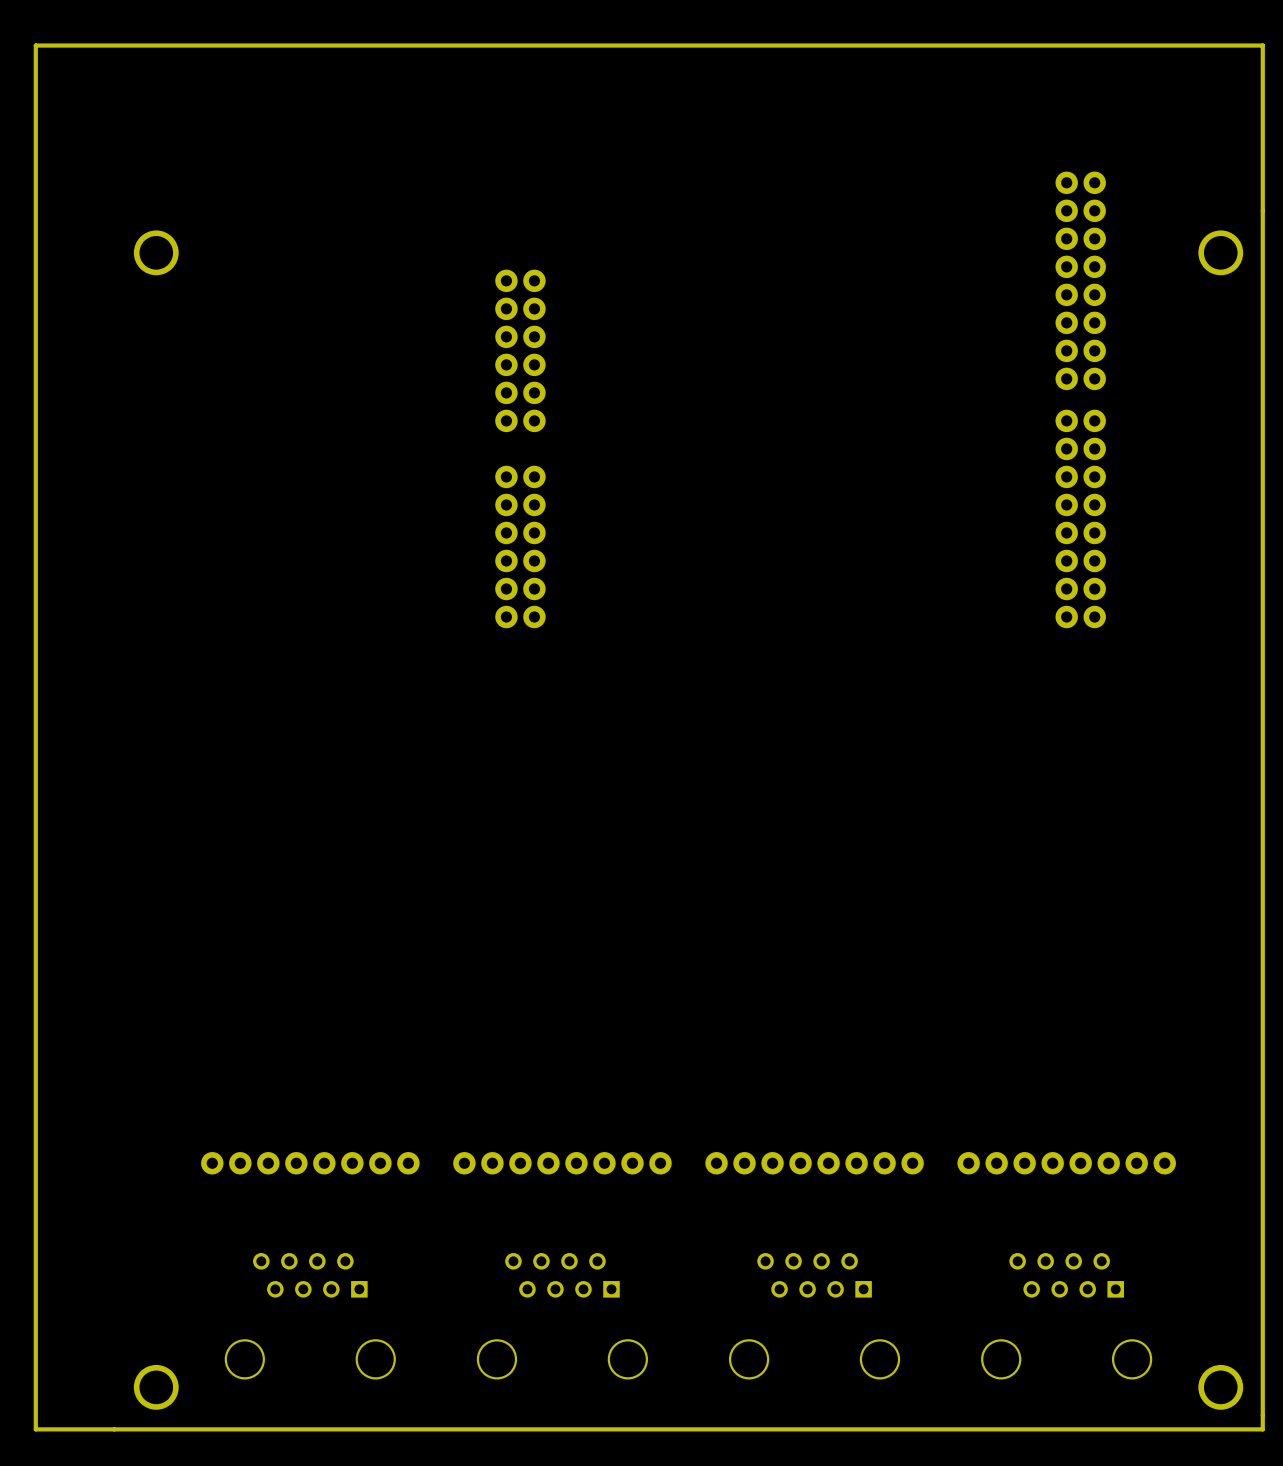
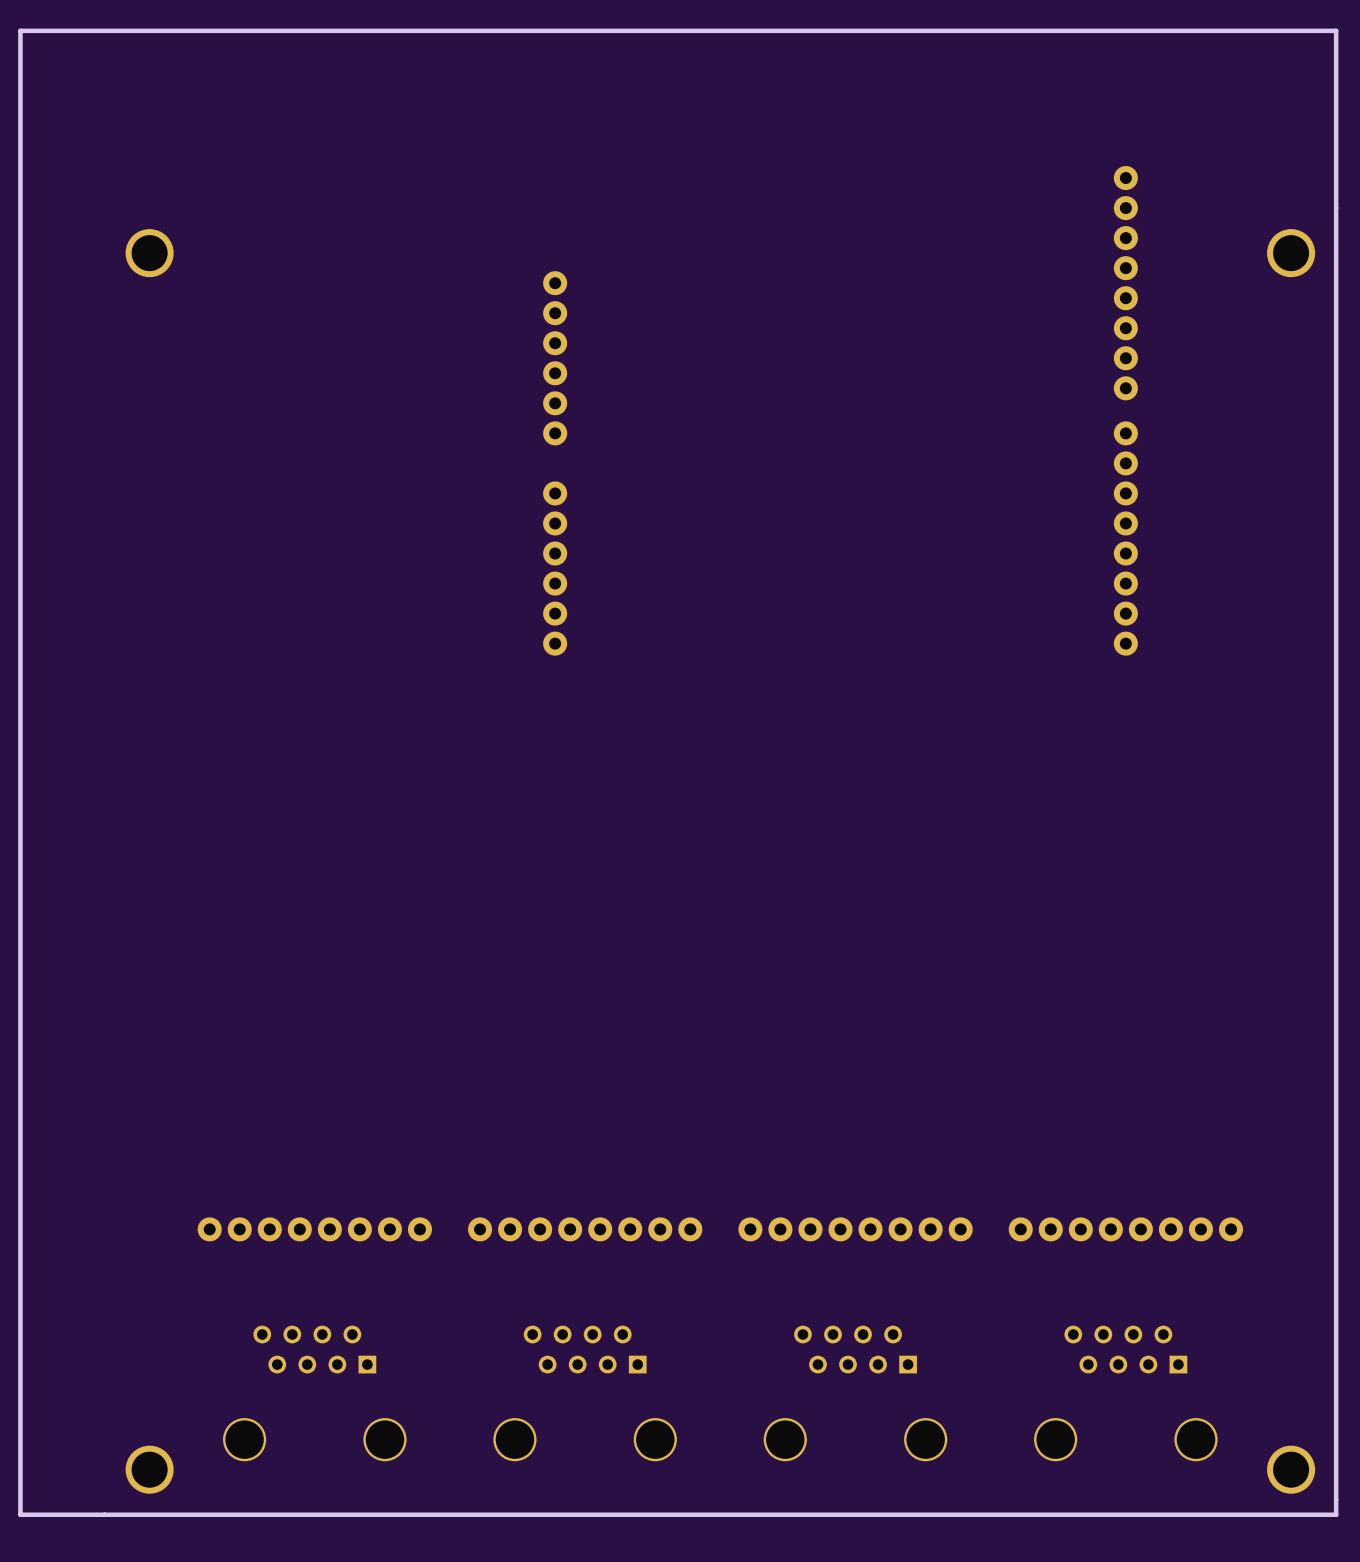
part: (1094, 280) -> none
part: (506, 350) -> none
part: (1094, 518) -> none
part: (506, 546) -> none

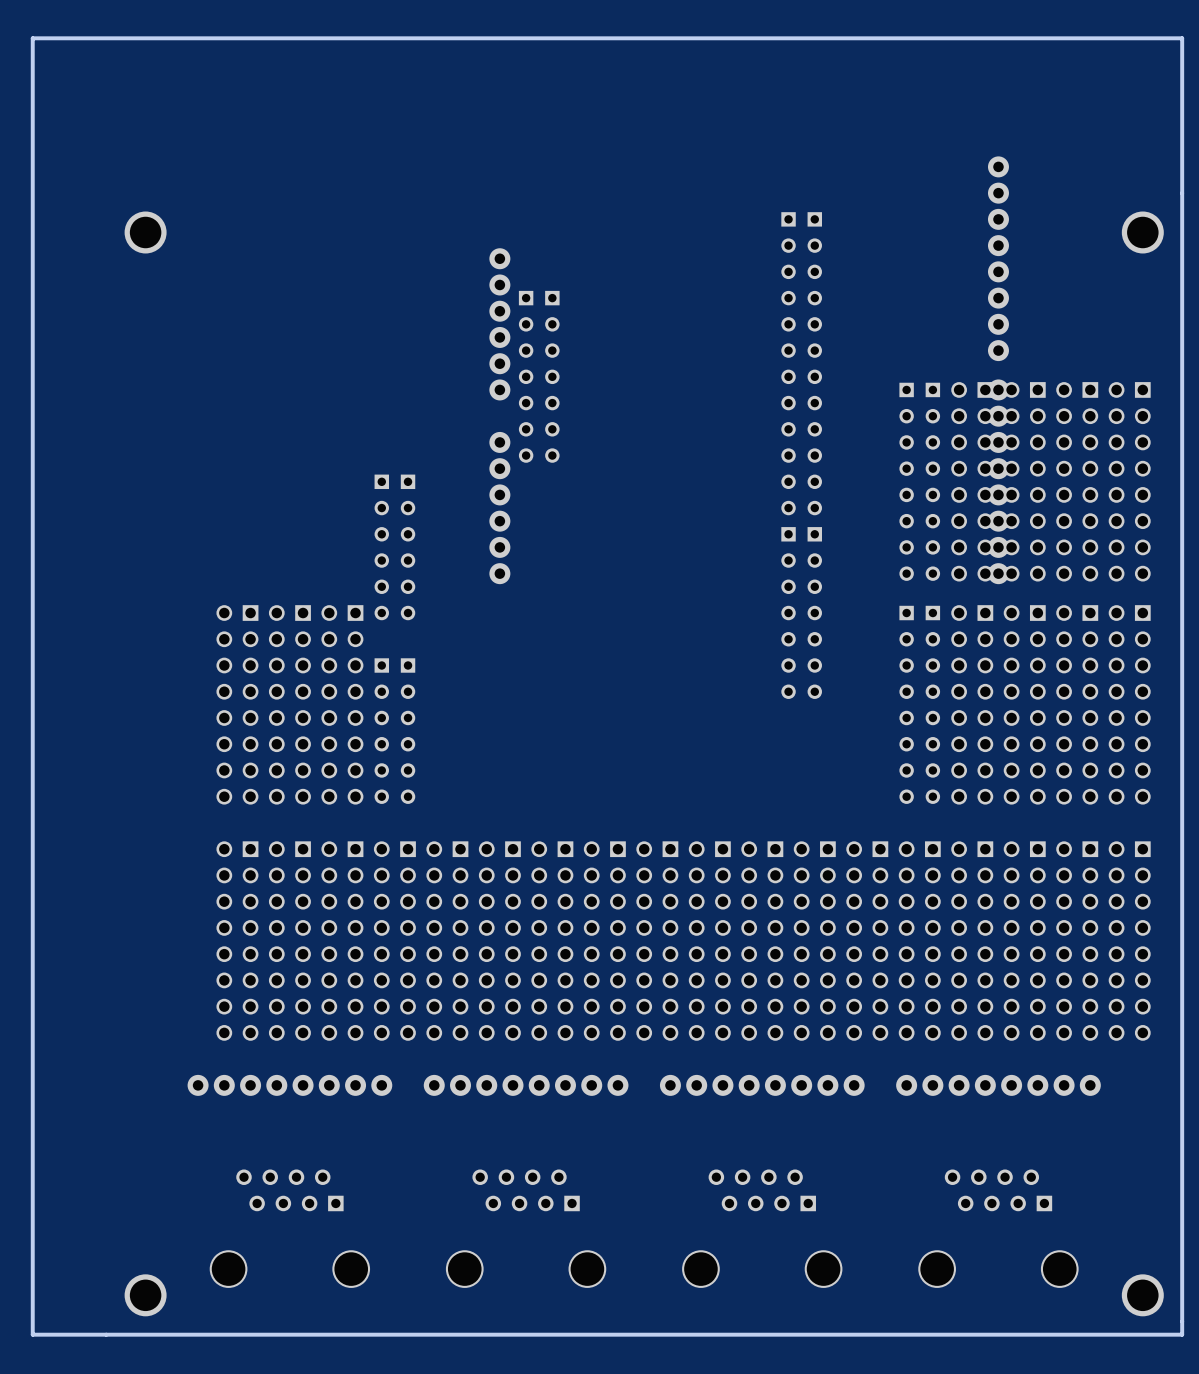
part: none -> (788, 363)
part: none -> (814, 363)
part: none -> (526, 376)
part: none -> (552, 376)
part: none -> (906, 481)
part: none -> (932, 481)
part: none -> (972, 481)
part: none -> (1024, 481)
part: none -> (1077, 481)
part: none -> (1129, 481)
part: none -> (381, 547)
part: none -> (408, 547)
part: none -> (788, 613)
part: none -> (814, 613)
part: none -> (237, 704)
part: none -> (289, 704)
part: none -> (342, 704)
part: none -> (906, 704)
part: none -> (932, 704)
part: none -> (972, 704)
part: none -> (1024, 704)
part: none -> (1077, 704)
part: none -> (1129, 704)
part: none -> (381, 731)
part: none -> (408, 731)
part: none -> (237, 941)
part: none -> (289, 941)
part: none -> (342, 941)
part: none -> (394, 941)
part: none -> (447, 941)
part: none -> (499, 941)
part: none -> (552, 941)
part: none -> (604, 941)
part: none -> (657, 941)
part: none -> (709, 941)
part: none -> (762, 941)
part: none -> (814, 941)
part: none -> (867, 941)
part: none -> (919, 941)
part: none -> (972, 941)
part: none -> (1024, 941)
part: none -> (1077, 941)
part: none -> (1129, 941)

